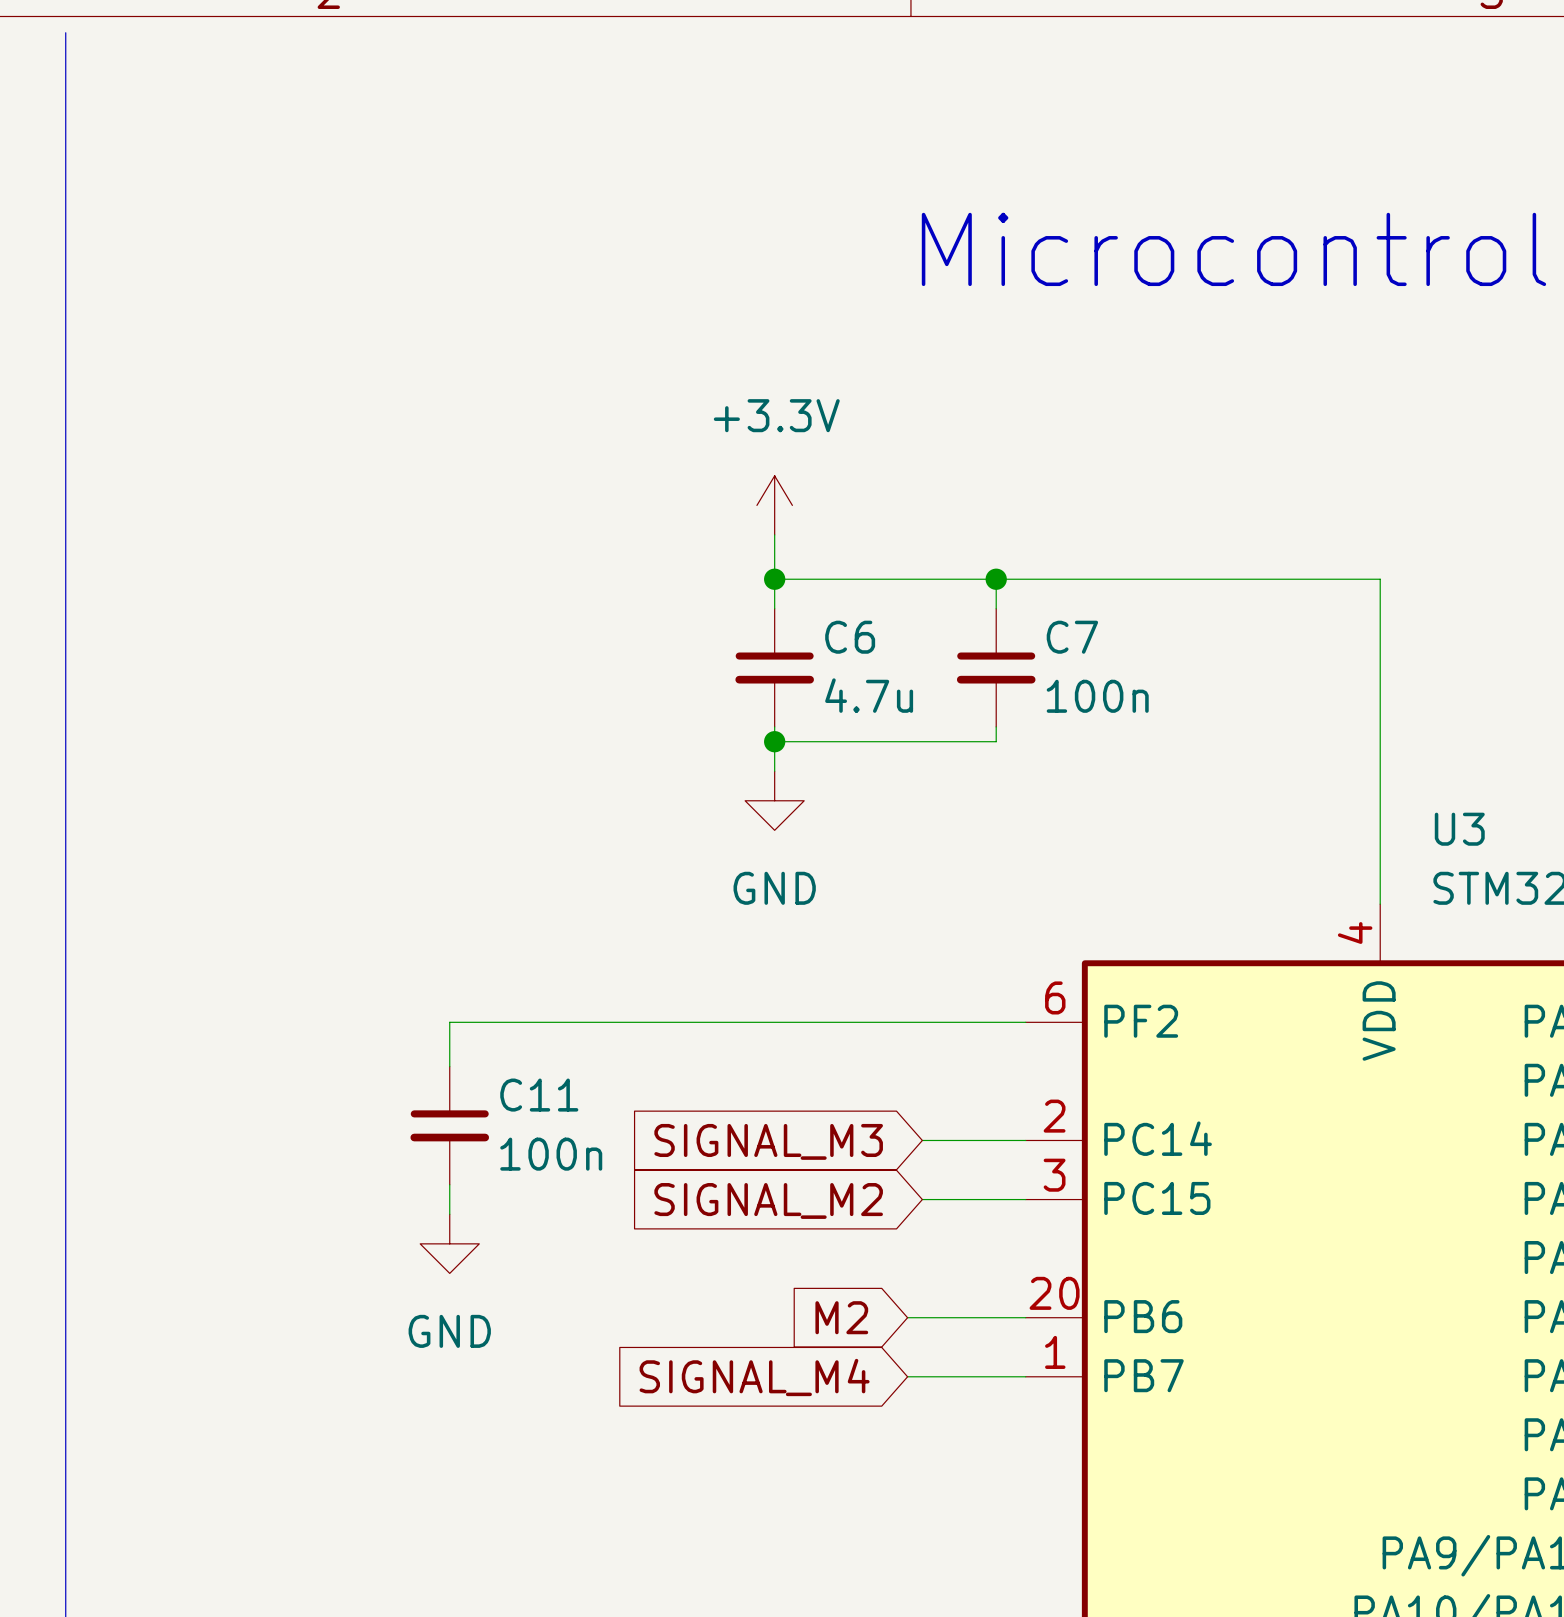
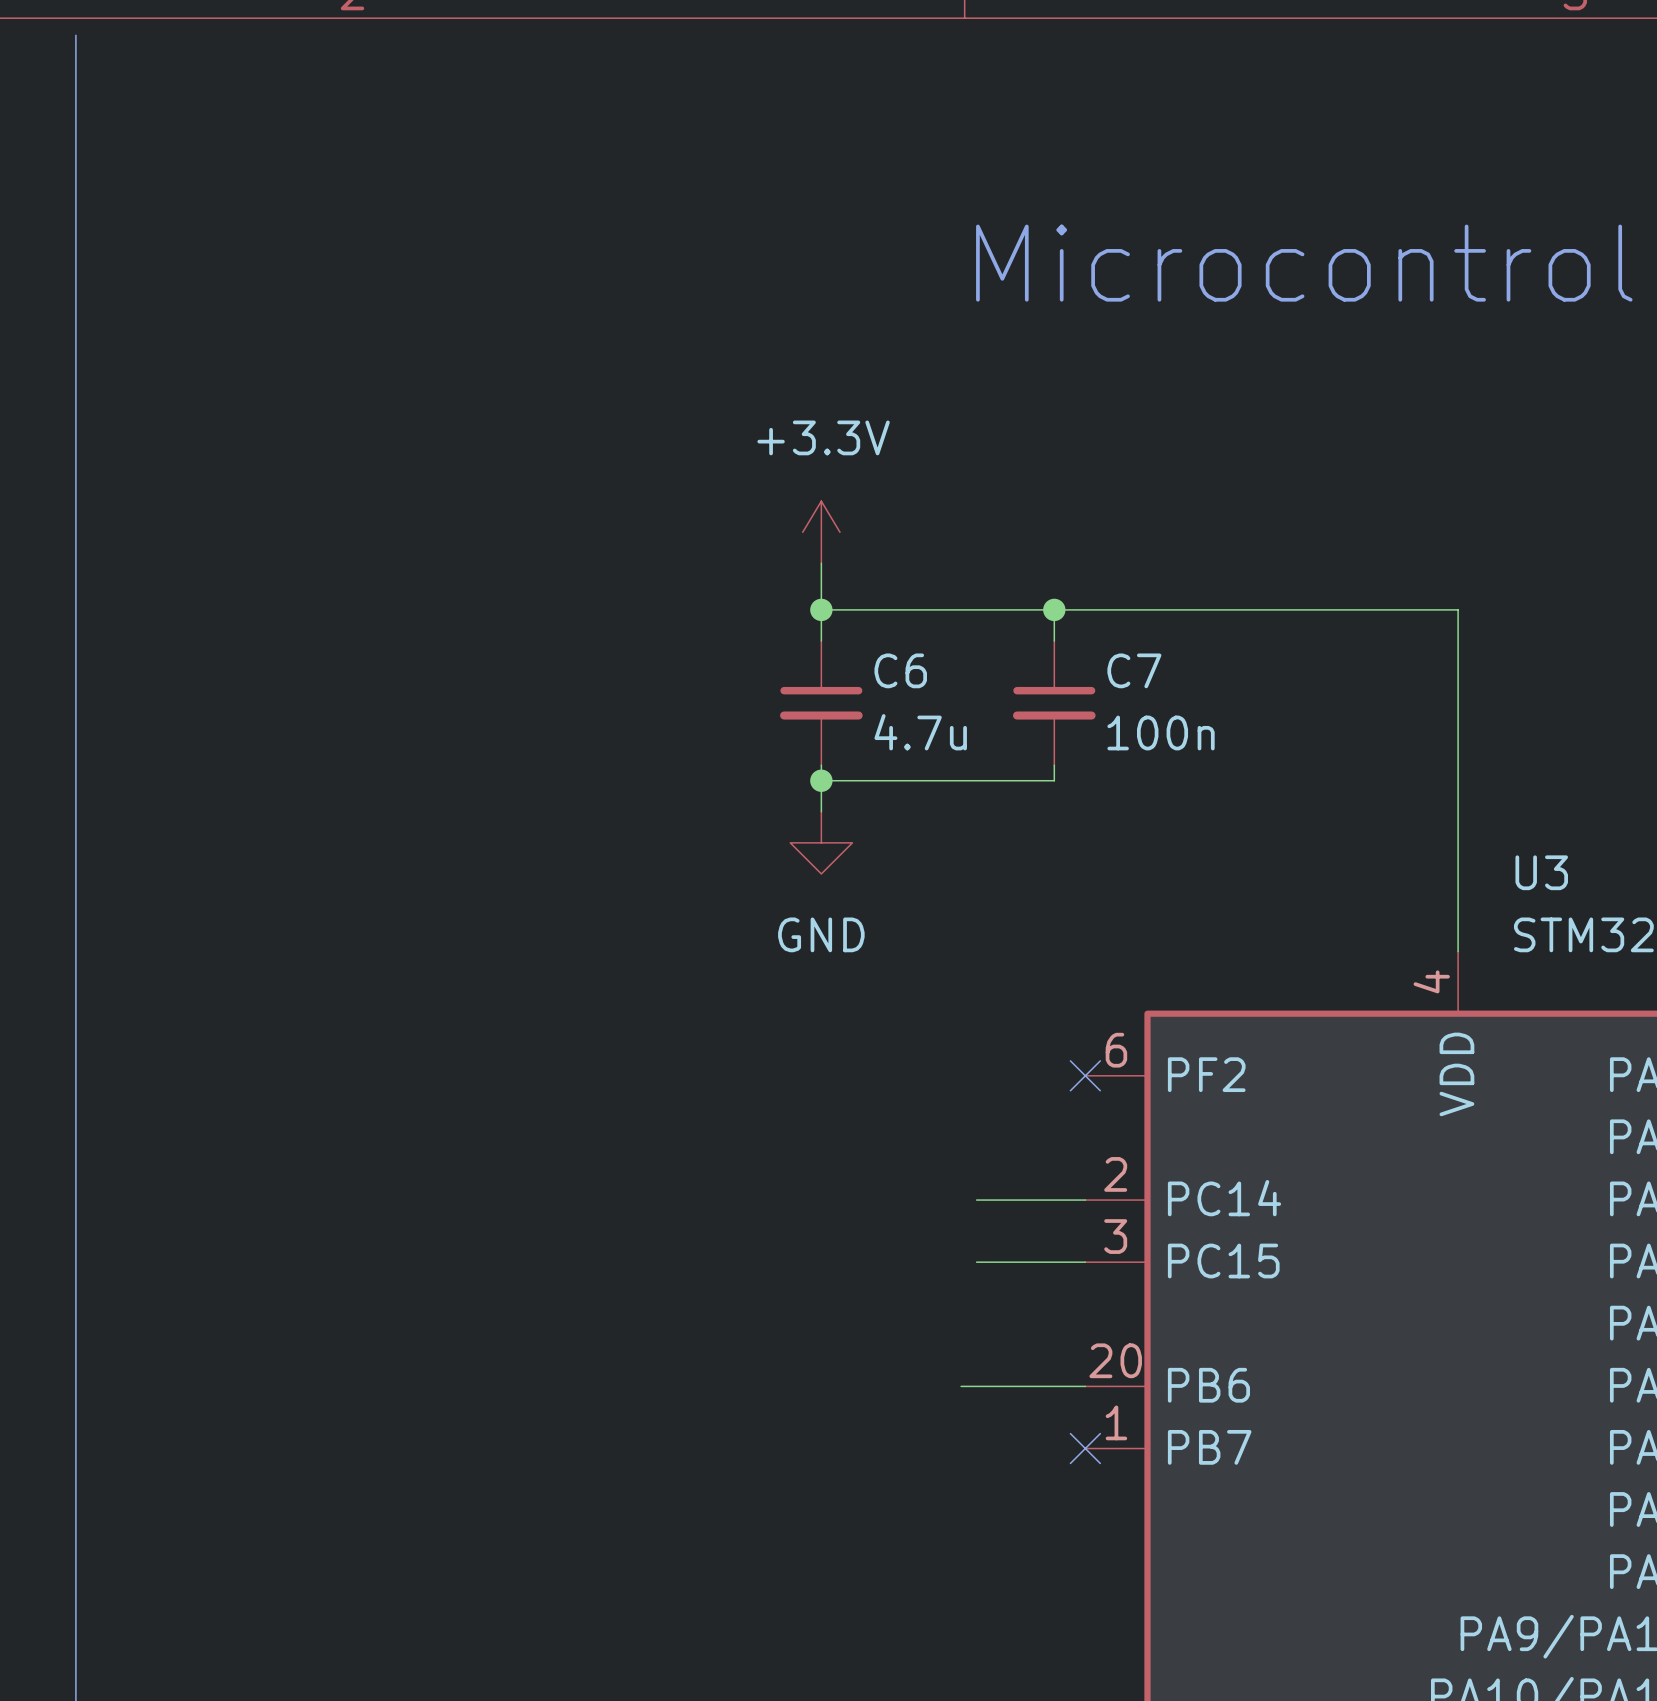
wire: (1025, 1022) (449, 1022) (449, 1066) -> none
no-connect mark: none -> (1085, 1075)
C11: 100n (449, 1125) -> none
global label: SIGNAL_M3 (768, 1141) -> none
wire: (449, 1184) (449, 1214) -> none
global label: SIGNAL_M2 (768, 1200) -> none
power symbol: GND (449, 1243) -> none
global label: M2 (841, 1317) -> none
wire: (907, 1376) (1025, 1376) -> none
no-connect mark: none -> (1085, 1448)
global label: SIGNAL_M4 (754, 1377) -> none

